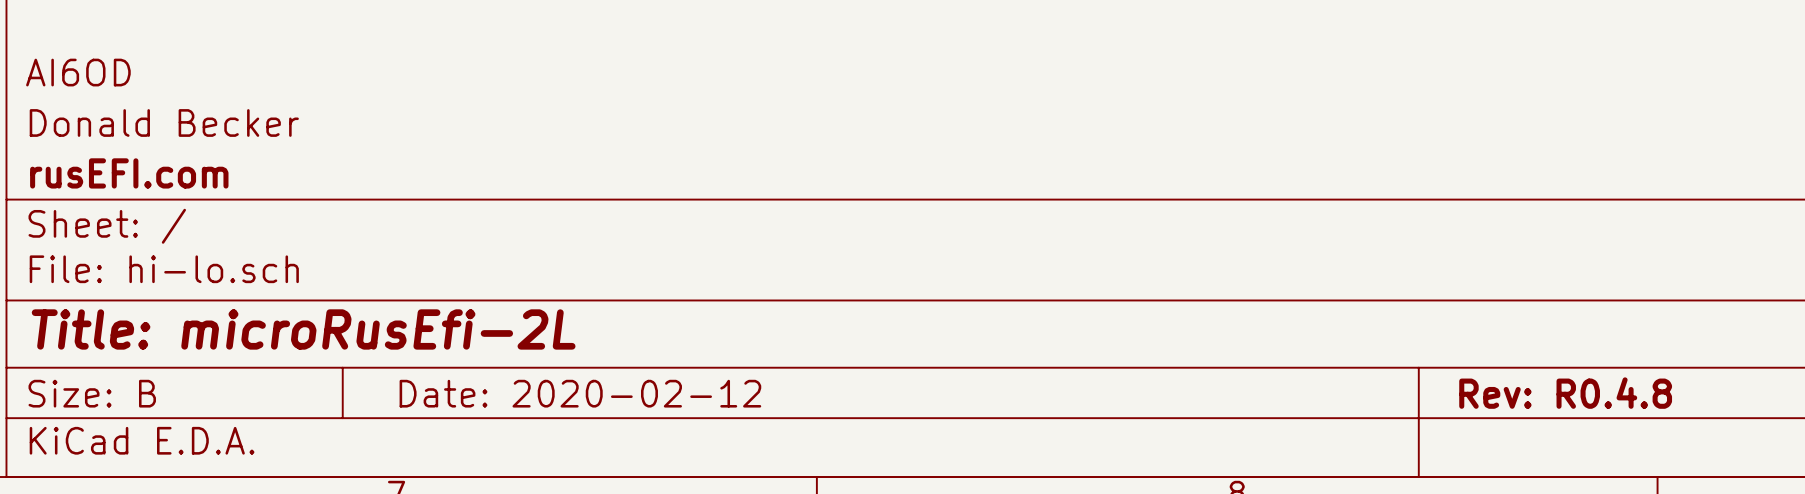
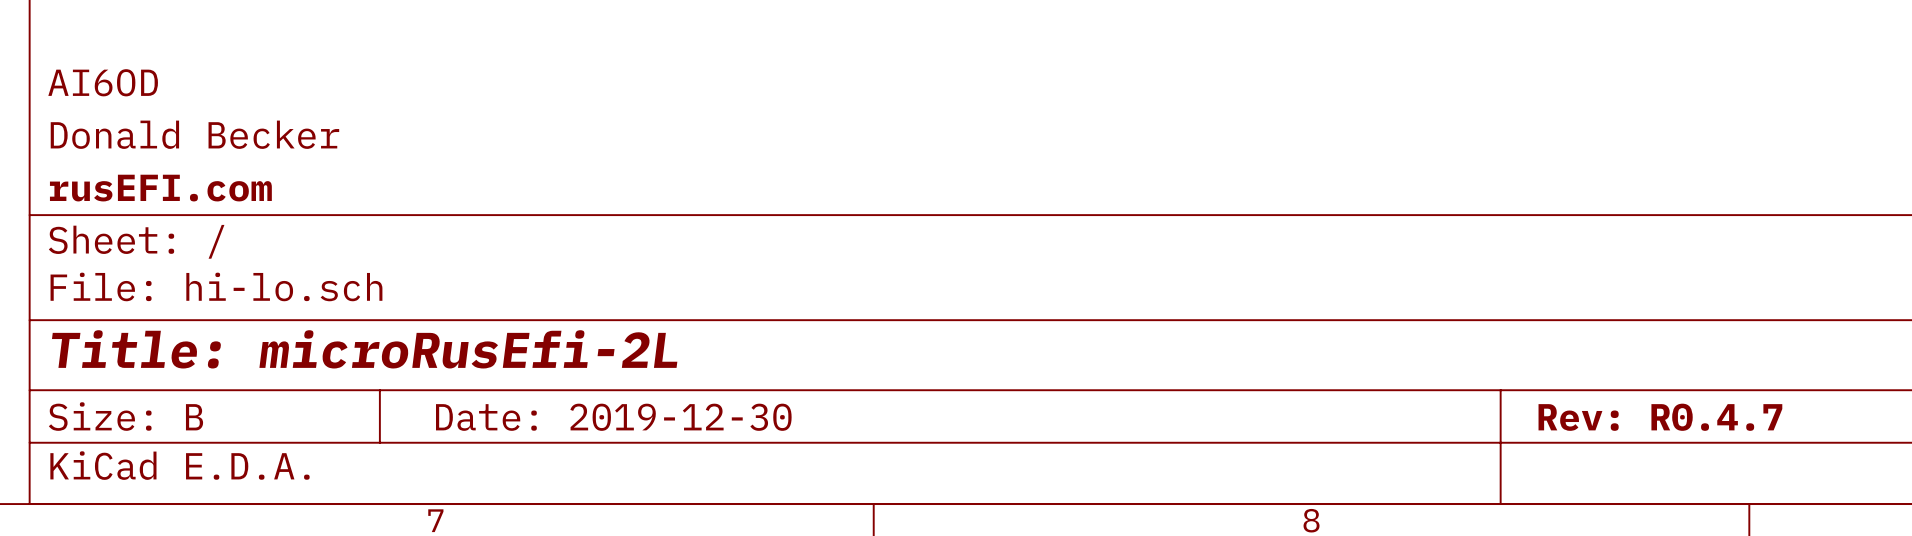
title block: Date: 2020-02-12 (580, 393) -> Date: 2019-12-30 (613, 417)
title block: Rev: R0.4.8 (1565, 393) -> Rev: R0.4.7 (1660, 417)

